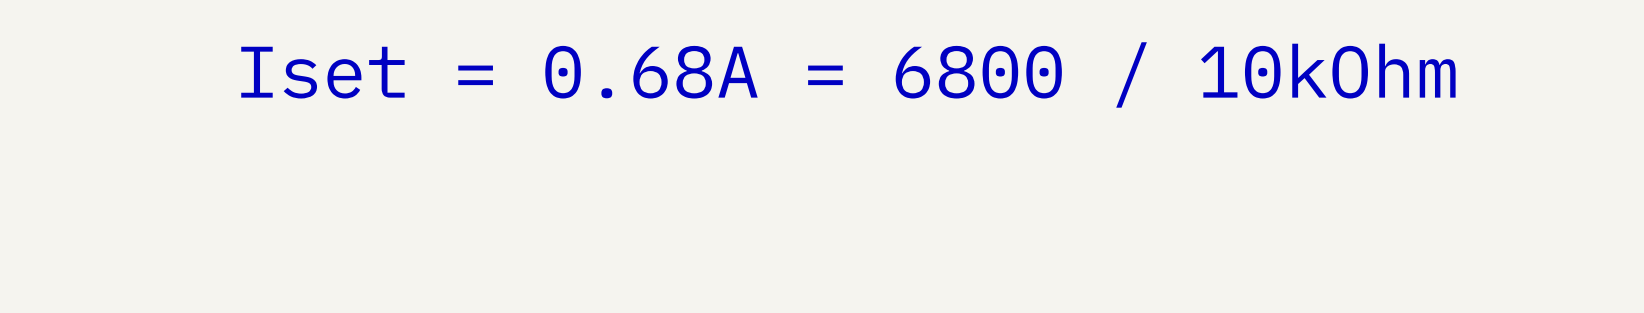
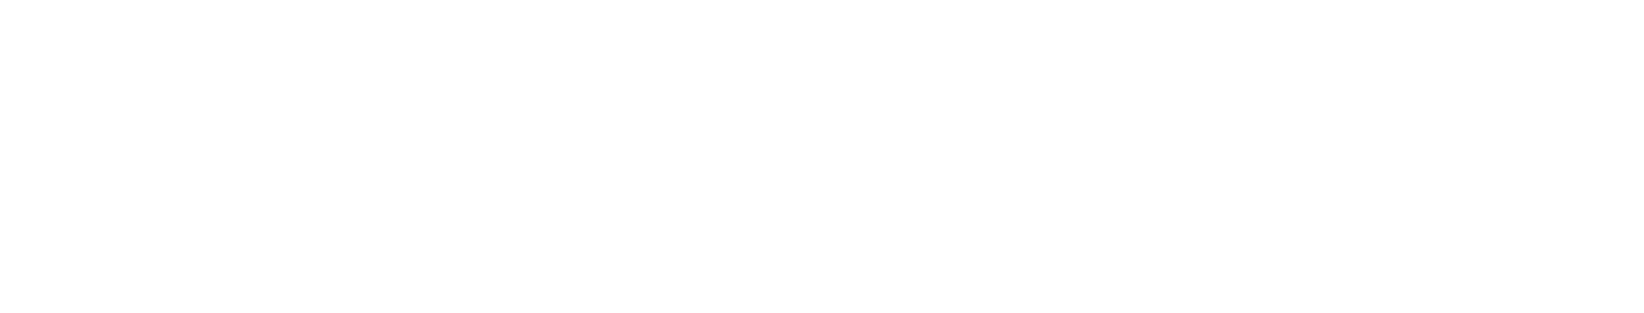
text: Iset = 0.68A = 6800 / 10kOhm (848, 74) -> none

